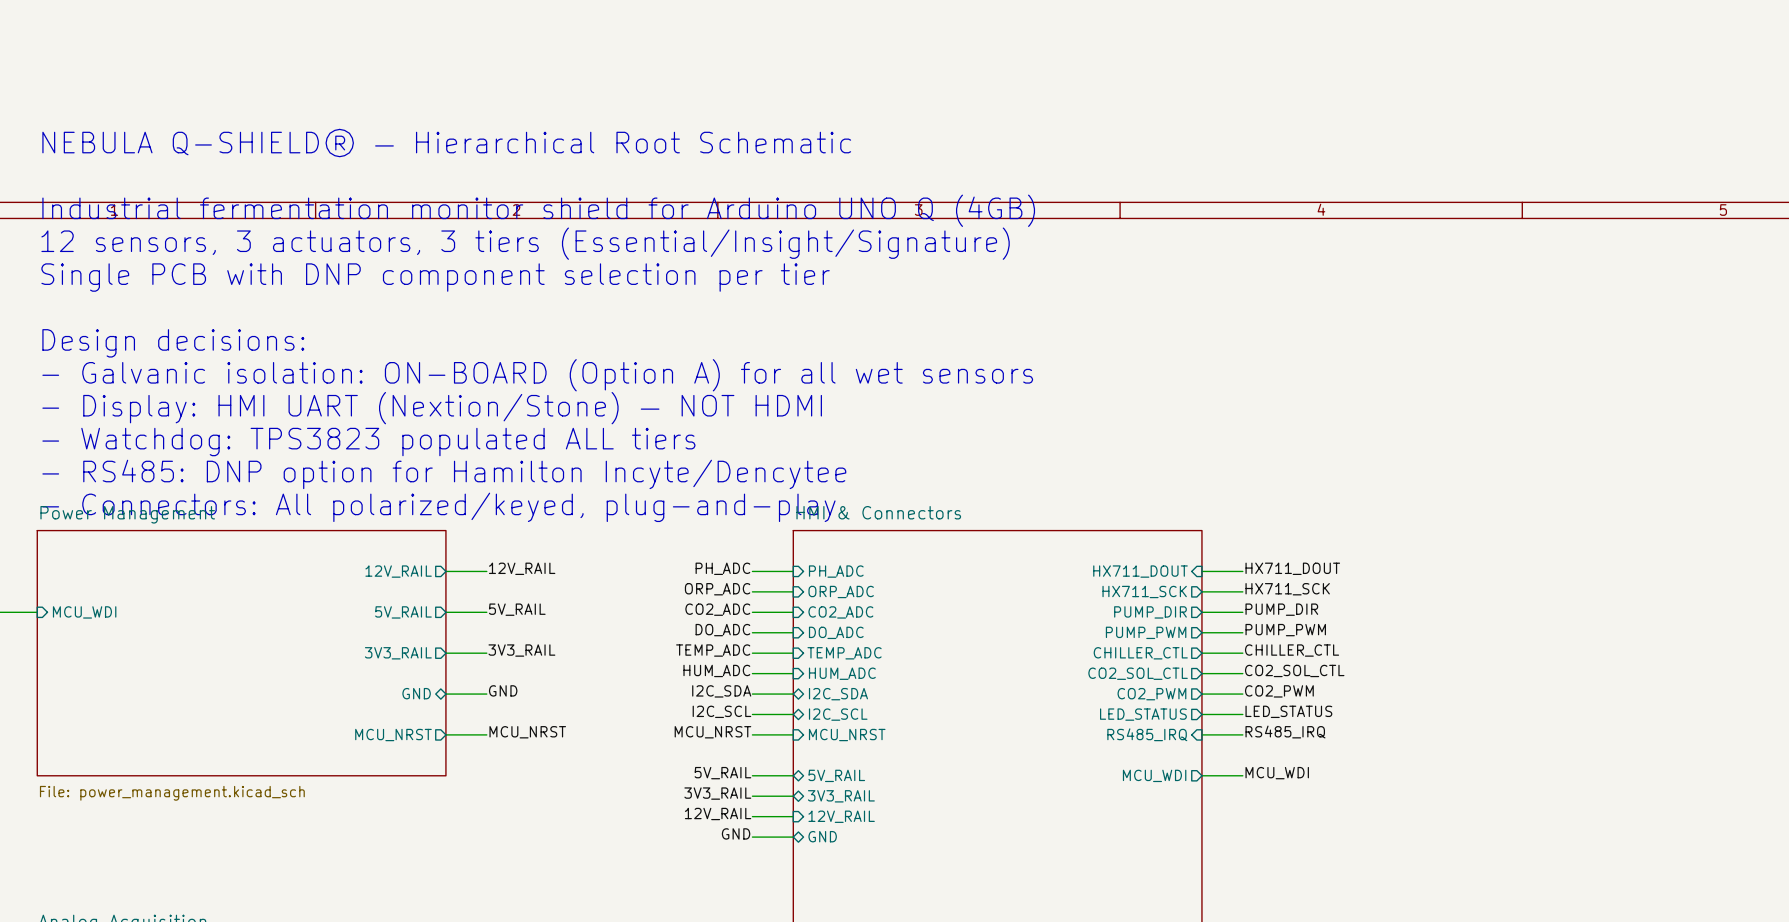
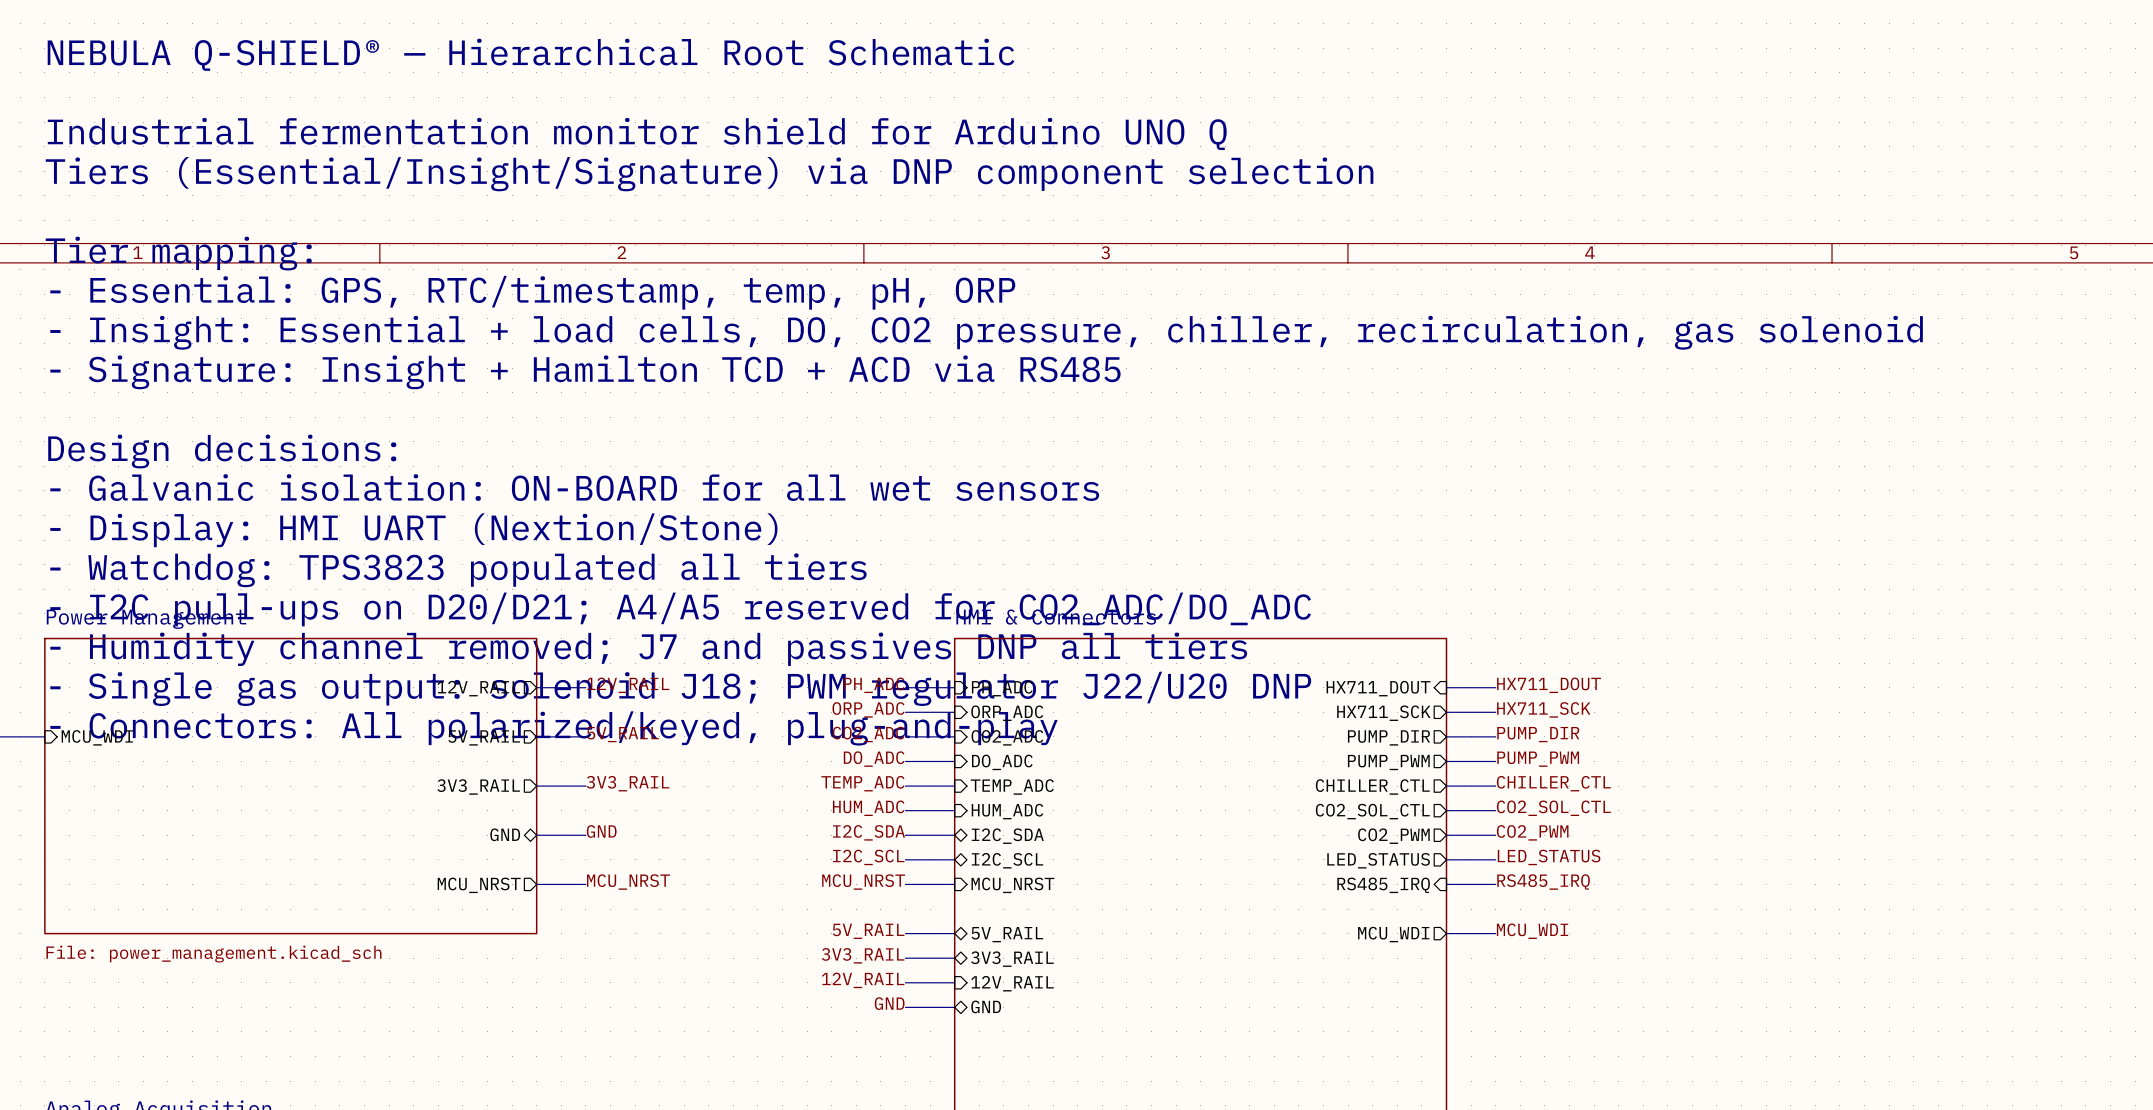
text: none -> NEBULA Q-SHIELD® — Hierarchical Root Schematic (530, 54)
text: none -> Industrial fermentation monitor shield for Arduino UNO Q (637, 133)
text: NEBULA Q-SHIELD® — Hierarchical Root Schematic (446, 143) -> Tiers (Essential/Insight/Signature) via DNP component selection (709, 174)
text: Industrial fermentation monitor shield for Arduino UNO Q (4GB) (538, 210) -> Tier mapping: (178, 253)
text: 12 sensors, 3 actuators, 3 tiers (Essential/Insight/Signature) (525, 243) -> - Essential: GPS, RTC/timestamp, temp, pH, ORP (532, 292)
text: Single PCB with DNP component selection per tier (435, 277) -> - Insight: Essential + load cells, DO, CO2 pressure, chiller, recirculation, gas solenoid (986, 332)
text: none -> - Signature: Insight + Hamilton TCD + ACD via RS485 (585, 372)
text: Design decisions: (173, 343) -> none
text: - Galvanic isolation: ON-BOARD (Option A) for all wet sensors (537, 375) -> Design decisions: (222, 451)
text: - Display: HMI UART (Nextion/Stone) — NOT HDMI (432, 408) -> - Galvanic isolation: ON-BOARD for all wet sensors (574, 487)
text: - Watchdog: TPS3823 populated ALL tiers (368, 442) -> - Display: HMI UART (Nextion/Stone) (413, 530)
text: - RS485: DNP option for Hamilton Incyte/Dencytee (444, 474) -> - Watchdog: TPS3823 populated all tiers (458, 570)
text: - Connectors: All polarized/keyed, plug-and-play (438, 507) -> - I2C pull-ups on D20/D21; A4/A5 reserved for CO2_ADC/DO_ADC (680, 609)
text: none -> - Humidity channel removed; J7 and passives DNP all tiers (648, 649)
text: none -> - Single gas output: solenoid J18; PWM regulator J22/U20 DNP (680, 688)
text: none -> - Connectors: All polarized/keyed, plug-and-play (553, 728)

